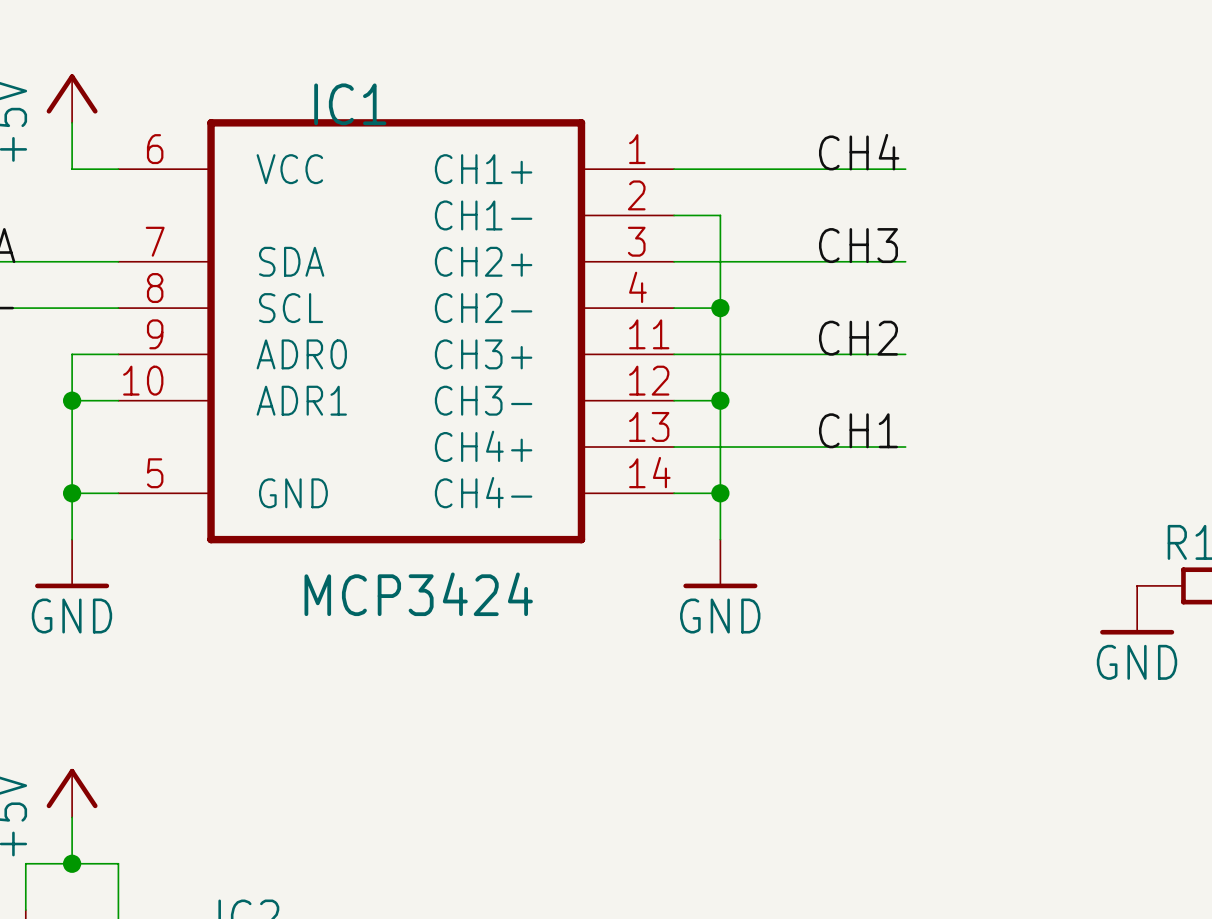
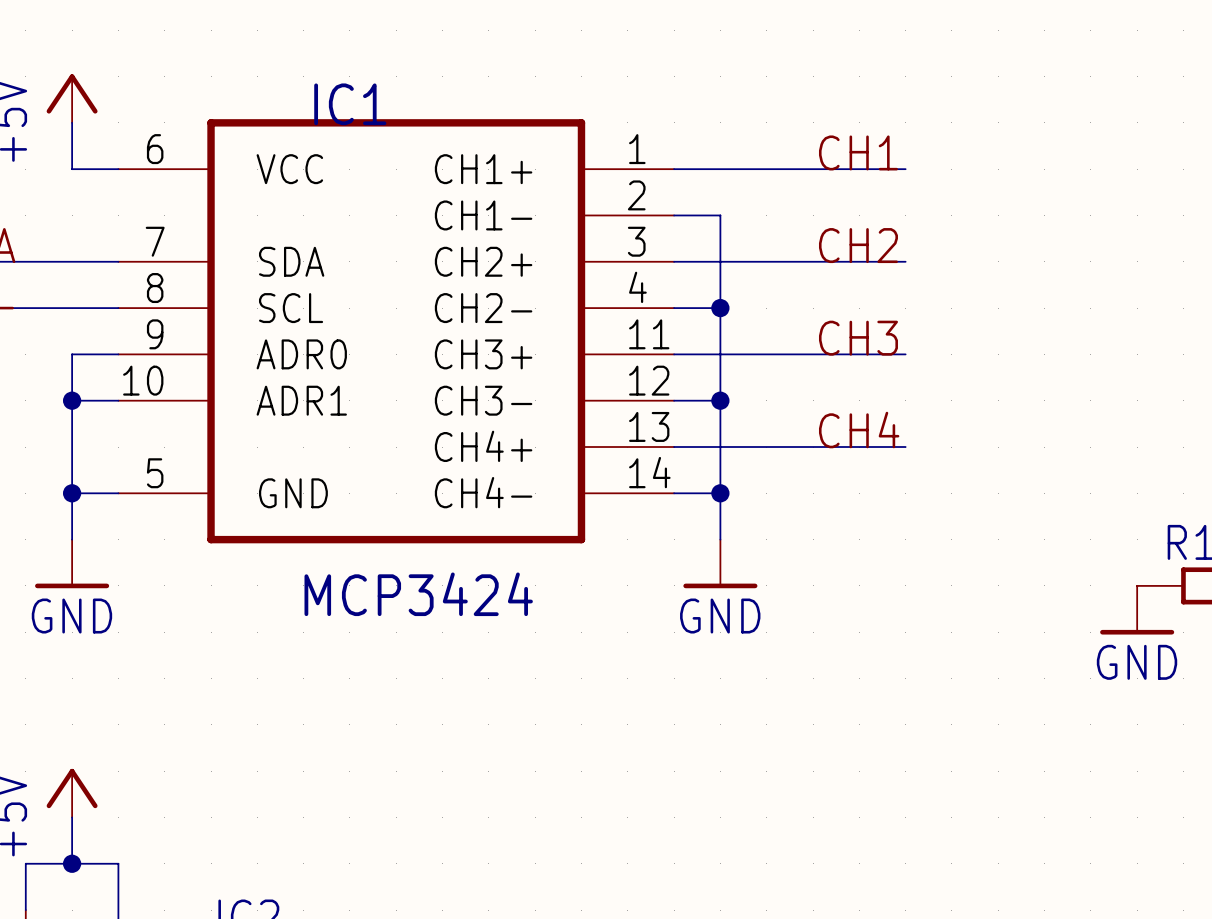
label: CH4 (859, 152) -> CH1 (858, 152)
label: CH3 (858, 245) -> CH2 (858, 245)
label: CH2 (858, 338) -> CH3 (858, 338)
label: CH1 (858, 430) -> CH4 (859, 430)

